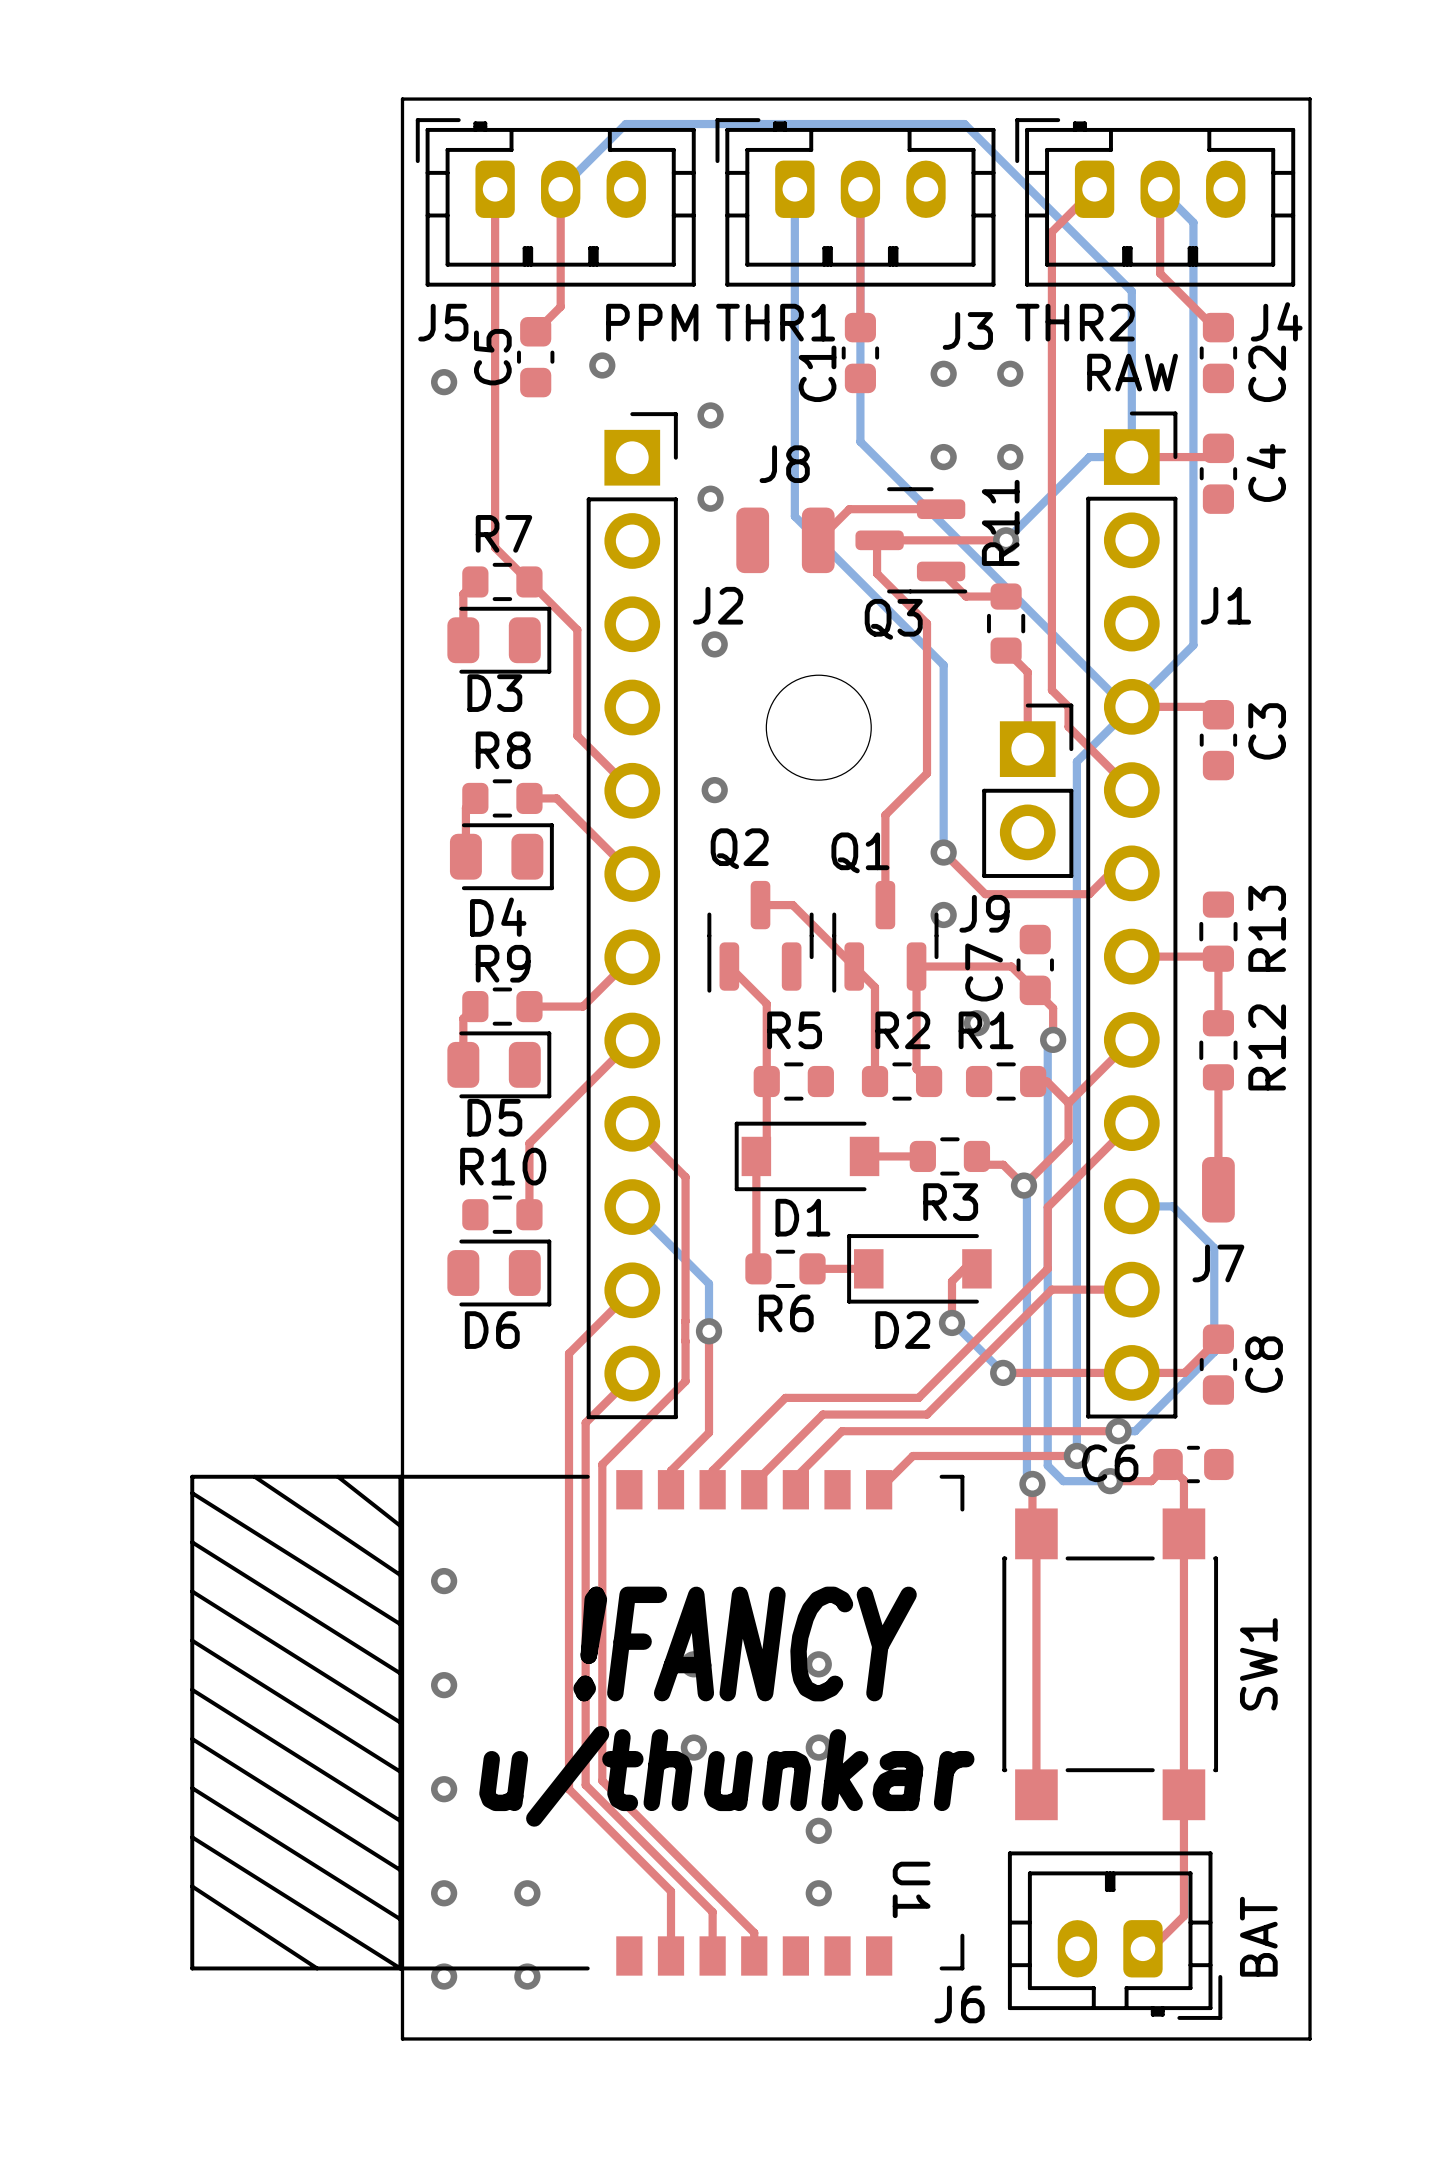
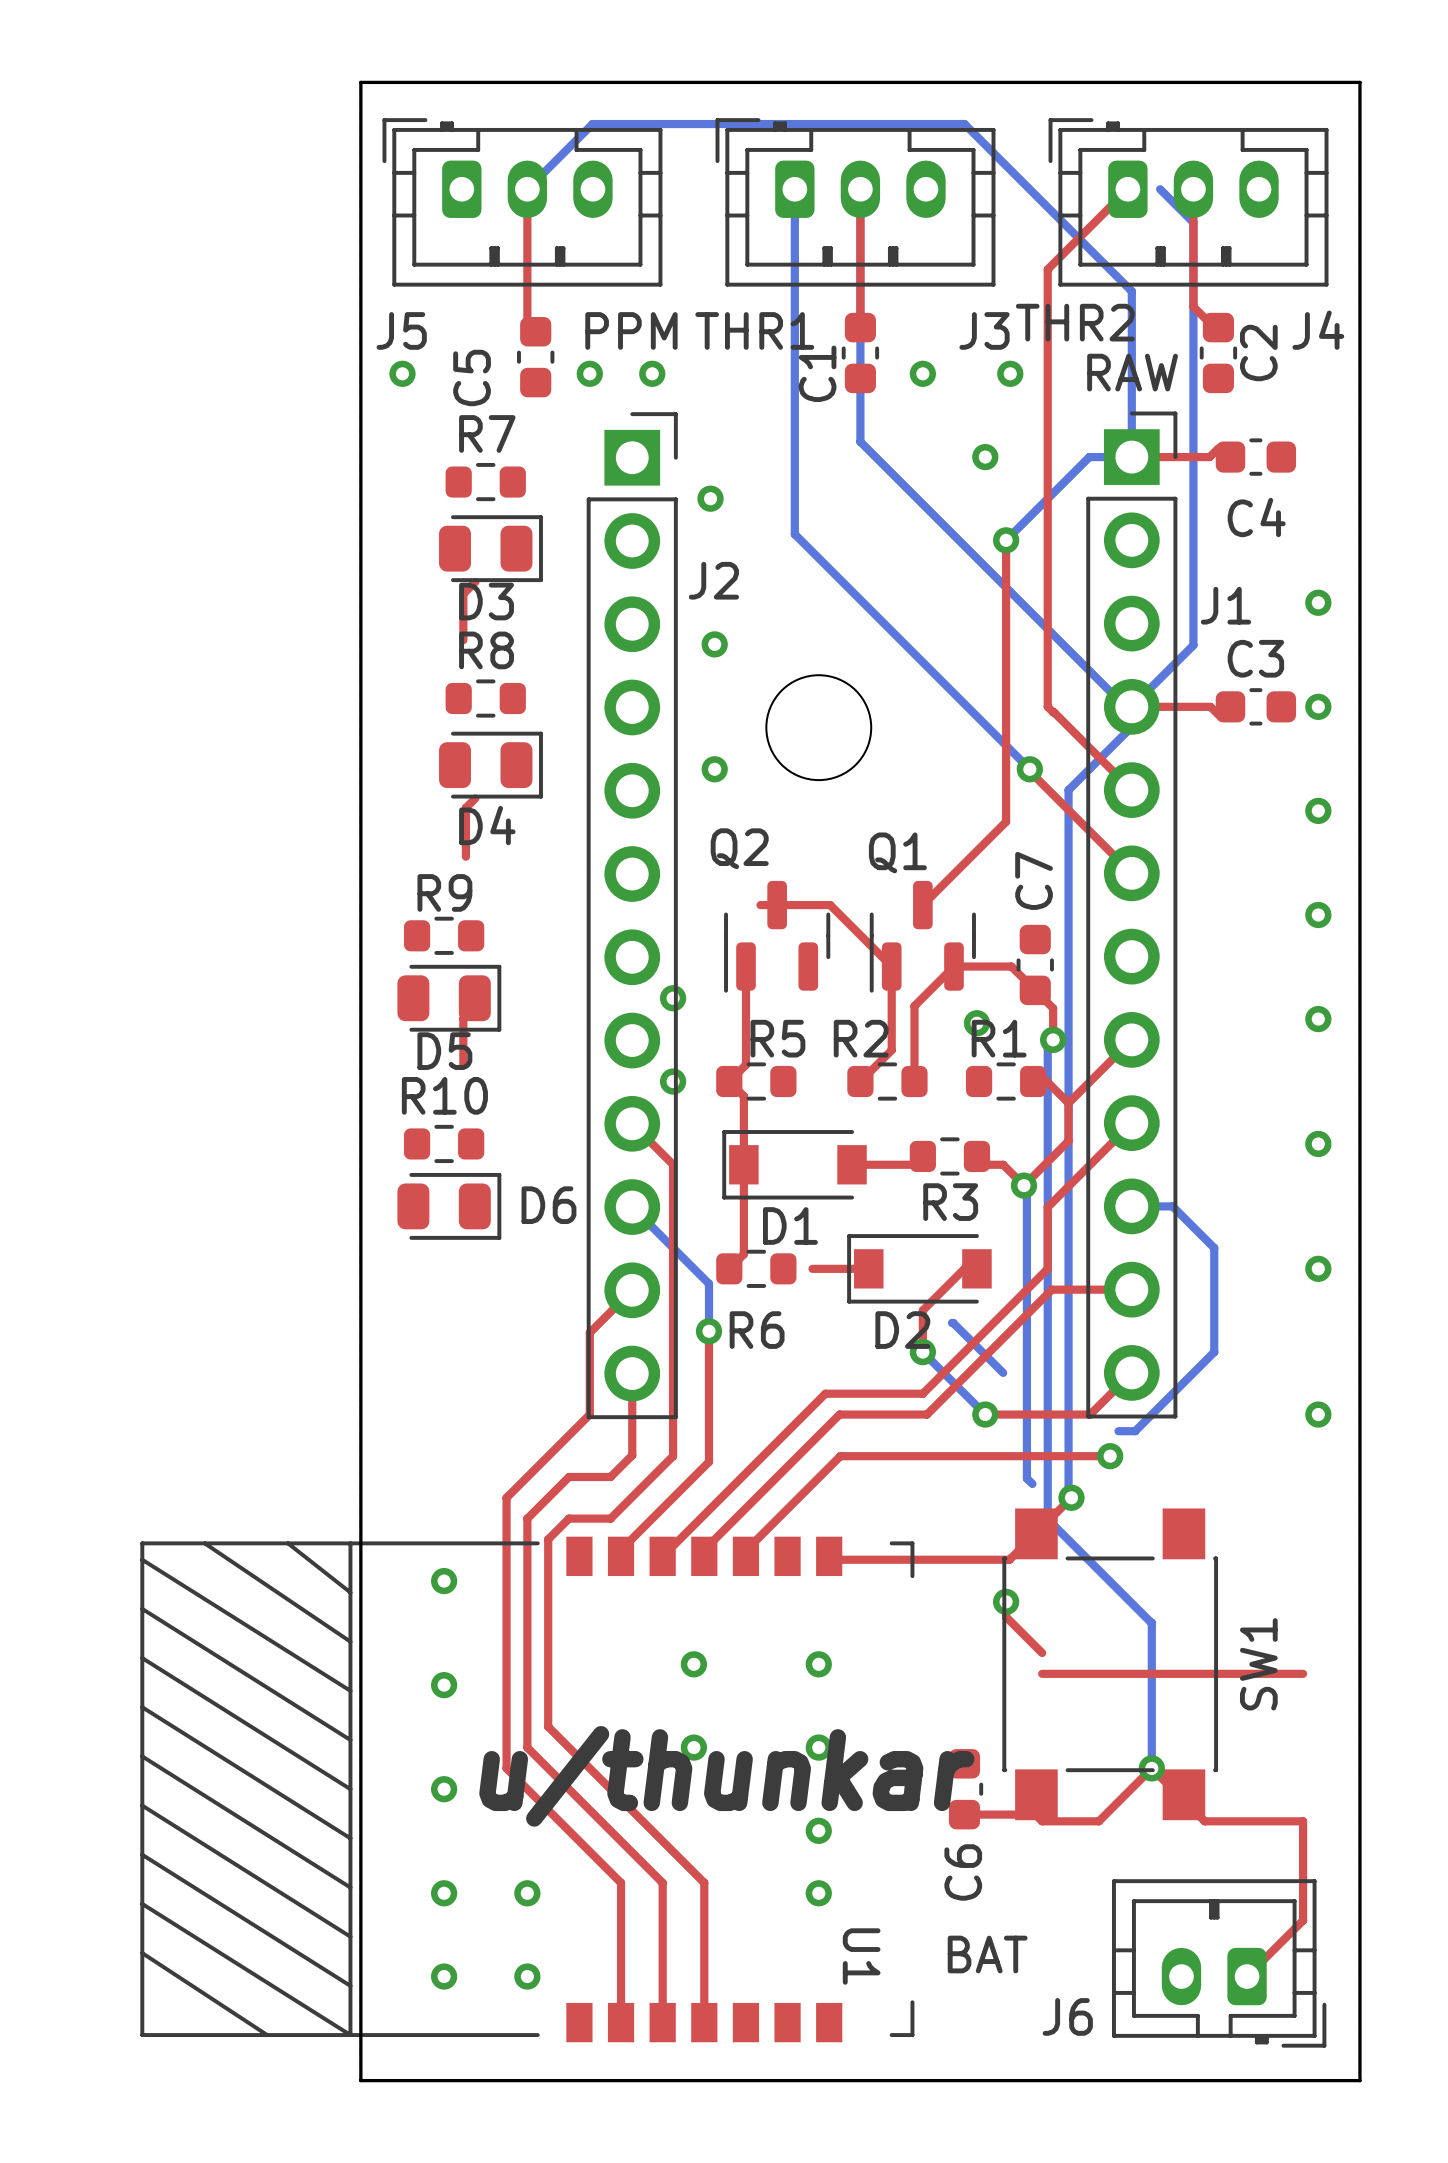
board edge: (402, 99) (1310, 99) (1310, 2038) (402, 2038) (402, 99) -> (360, 82) (360, 2080) (1359, 2080) (1359, 82) (360, 82)
bottom track: (625, 124) (560, 189) -> (625, 124) (592, 124) (527, 189)
top track: (495, 189) (495, 547) (577, 629) (577, 735) (632, 790) -> none
top track: none -> (527, 189) (527, 321)
top track: (560, 189) (560, 306) (535, 331) -> none
top track: (1094, 189) (1051, 231) (1051, 690) (1068, 706) (1068, 726) -> (1127, 189) (1047, 269) (1047, 706) (1068, 726)
top track: (1160, 189) (1160, 273) (1193, 306) -> (1193, 189) (1193, 306)
J5 position: (555, 202) -> (522, 202)
J4 position: (1155, 202) -> (1188, 202)
J4 name position: J4 (1276, 321) -> J4 (1318, 330)
J5 name position: J5 (443, 322) -> J5 (401, 330)
text position: PPM (652, 322) -> PPM (631, 330)
text position: THR1 (775, 322) -> THR1 (754, 330)
J3 name position: J3 (967, 330) -> J3 (984, 330)
C5 name position: C5 (492, 357) -> C5 (472, 377)
via position: (602, 365) -> (589, 373)
via: none -> (652, 373)
via position: (943, 373) -> (922, 373)
C2 name position: C2 (1267, 373) -> C2 (1258, 353)
via position: (444, 382) -> (402, 373)
via: (710, 415) -> none
via: (943, 457) -> none
via position: (1010, 457) -> (985, 457)
C4 rotation: 0° (1218, 473) -> 90° clockwise (1255, 457)
top track: (941, 509) (849, 509) (818, 540) -> none
bottom track: (794, 516) (943, 665) (943, 852) -> (794, 516) (794, 534) (1029, 769)
J8: (785, 540) -> none
Q3: (911, 540) -> none
top track: (1006, 540) (879, 540) (877, 542) (877, 573) (927, 623) (927, 773) (885, 815) (885, 905) -> (1006, 540) (1006, 821) (922, 905)
top track: (941, 571) (966, 596) (1006, 596) -> none
R7 position: (502, 581) -> (485, 482)
via: none -> (1318, 602)
J2 name position: J2 (718, 605) -> J2 (713, 580)
R11: (1006, 623) -> none
D3 position: (499, 640) -> (490, 548)
top track: (1006, 650) (1027, 672) (1027, 749) -> none
bottom track: (1131, 706) (1076, 761) (1076, 1455) -> (1131, 706) (1131, 726) (1068, 790) (1068, 1494) (1071, 1497)
via: none -> (1318, 706)
C3 rotation: 0° (1218, 740) -> 90° clockwise (1255, 706)
C3 position: (1218, 740) -> (1255, 706)
via: none -> (1029, 769)
via position: (714, 790) -> (714, 769)
J9: (1027, 790) -> none
R8 position: (502, 798) -> (485, 698)
top track: (529, 798) (556, 798) (632, 874) -> none
via: none -> (1318, 810)
top track: (943, 852) (985, 894) (1089, 894) (1110, 873) (1131, 873) -> (1027, 769) (1131, 873)
via: (943, 852) -> none
D4 position: (501, 856) -> (490, 765)
top track: (792, 905) (875, 987) (875, 1081) -> (792, 905) (830, 905) (891, 966) (891, 1050) (860, 1081)
via: (943, 914) -> none
via: none -> (1318, 914)
R13: (1218, 931) -> none
Q2 position: (760, 936) -> (777, 936)
Q1 position: (885, 936) -> (922, 936)
top track: (1131, 956) (1216, 956) (1218, 958) (1218, 1023) -> none
top track: (632, 957) (582, 1006) (529, 1006) -> none
top track: (729, 966) (766, 1003) (766, 1146) (756, 1156) (756, 1266) (758, 1268) -> none
top track: none -> (746, 966) (746, 1064) (729, 1081) (743, 1096) (743, 1254) (729, 1268)
top track: (953, 966) (916, 966) (916, 1068) (929, 1081) -> (953, 966) (914, 1006) (914, 1081)
C7 name position: C7 (984, 972) -> C7 (1034, 880)
via: none -> (673, 998)
R9 position: (502, 1006) -> (444, 935)
via: none -> (1318, 1019)
R5 name position: R5 (794, 1030) -> R5 (777, 1038)
R2 name position: R2 (902, 1030) -> R2 (861, 1038)
R1 name position: R1 (986, 1030) -> R1 (999, 1038)
top track: (632, 1040) (529, 1143) (529, 1214) -> none
R12: (1218, 1050) -> none
D5 position: (499, 1064) -> (449, 998)
top track: (1218, 1077) (1218, 1189) -> none
via: none -> (673, 1081)
R5 position: (793, 1081) -> (756, 1081)
R2 position: (902, 1081) -> (887, 1081)
via: none -> (1318, 1143)
D1 position: (807, 1156) -> (794, 1164)
top track: (864, 1156) (922, 1156) -> none
top track: (673, 1164) (685, 1177) (685, 1321) -> none
top track: none -> (852, 1164) (922, 1164)
J7: (1218, 1189) -> none
R10 position: (502, 1214) -> (444, 1143)
R6 position: (785, 1268) -> (756, 1268)
via: none -> (1318, 1268)
D6 position: (499, 1273) -> (449, 1206)
top track: (951, 1281) (951, 1322) -> (951, 1281) (922, 1310) (922, 1352)
R6 name position: R6 (786, 1313) -> R6 (757, 1330)
top track: (685, 1321) (685, 1341) -> none
via: (951, 1322) -> none
D6 name position: D6 (492, 1330) -> D6 (548, 1205)
top track: (589, 1332) (569, 1353) (569, 1789) -> (632, 1376) (632, 1455) (610, 1476) (569, 1476) (527, 1518) (527, 1747) (569, 1789)
top track: none -> (589, 1332) (589, 1414) (506, 1497) (506, 1768) (621, 1882) (621, 2018)
top track: (1218, 1339) (1184, 1372) (1003, 1372) -> none
top track: (685, 1341) (685, 1381) (602, 1464) (602, 1780) -> (673, 1164) (673, 1456) (610, 1518) (569, 1518) (548, 1539) (548, 1726) (602, 1780)
bottom track: none -> (922, 1352) (985, 1414)
via: none -> (922, 1352)
C8: (1218, 1364) -> none
via: (1003, 1372) -> none
top track: none -> (1131, 1372) (1090, 1414) (985, 1414)
top track: (632, 1376) (585, 1422) (585, 1785) (712, 1912) (712, 1955) -> none
top track: (922, 1393) (918, 1397) (785, 1397) (712, 1470) (712, 1489) -> (922, 1393) (825, 1393) (662, 1556) (662, 1559)
top track: (839, 1414) (822, 1414) (754, 1483) (754, 1489) -> (839, 1414) (704, 1549) (704, 1559)
via: none -> (985, 1414)
via: none -> (1318, 1414)
top track: (1118, 1431) (842, 1431) (795, 1477) (795, 1489) -> none
via: (1118, 1431) -> none
top track: (709, 1432) (671, 1470) (671, 1499) -> (709, 1432) (709, 1461) (621, 1549) (621, 1559)
top track: (1076, 1455) (912, 1455) (879, 1489) -> none
via: (1076, 1455) -> none
top track: none -> (1110, 1456) (840, 1456) (745, 1550) (745, 1559)
via: none -> (1110, 1456)
C6 name position: C6 (1110, 1463) -> C6 (963, 1872)
C6 rotation: 0° (1193, 1464) -> 90° clockwise (964, 1789)
C6 position: (1193, 1464) -> (964, 1789)
bottom track: (1047, 1465) (1063, 1481) (1110, 1481) -> (1047, 1465) (1047, 1519) (1151, 1622)
top track: (1110, 1481) (1151, 1481) (1168, 1464) (1183, 1480) (1183, 1916) (1142, 1957) -> none
via: (1110, 1481) -> none
top track: (1032, 1483) (1032, 1538) (1036, 1542) (1036, 1803) -> none
via: (1032, 1483) -> none
top track: none -> (1071, 1497) (1009, 1559) (829, 1559)
via: none -> (1071, 1497)
top track: none -> (1006, 1601) (1006, 1616) (1042, 1653)
via: none -> (1006, 1601)
bottom track: none -> (1151, 1622) (1151, 1768)
text: !FANCY (745, 1643) -> none
top track: none -> (1042, 1673) (1303, 1673)
U1 position: (577, 1722) -> (527, 1789)
via: none -> (1151, 1768)
top track: none -> (964, 1814) (1035, 1814) (1042, 1821) (1098, 1821) (1151, 1768) (1204, 1821) (1303, 1821) (1303, 1920) (1247, 1976)
top track: (662, 1882) (671, 1891) (671, 1955) -> (662, 1882) (662, 2018)
top track: (704, 1882) (754, 1932) (754, 1955) -> (704, 1882) (704, 2018)
J6 position: (1115, 1935) -> (1219, 1963)
text rotation: 0° (1258, 1936) -> 90° clockwise (987, 1954)
text position: BAT (1258, 1936) -> BAT (987, 1954)
J6 name position: J6 (959, 2004) -> J6 (1067, 2016)

